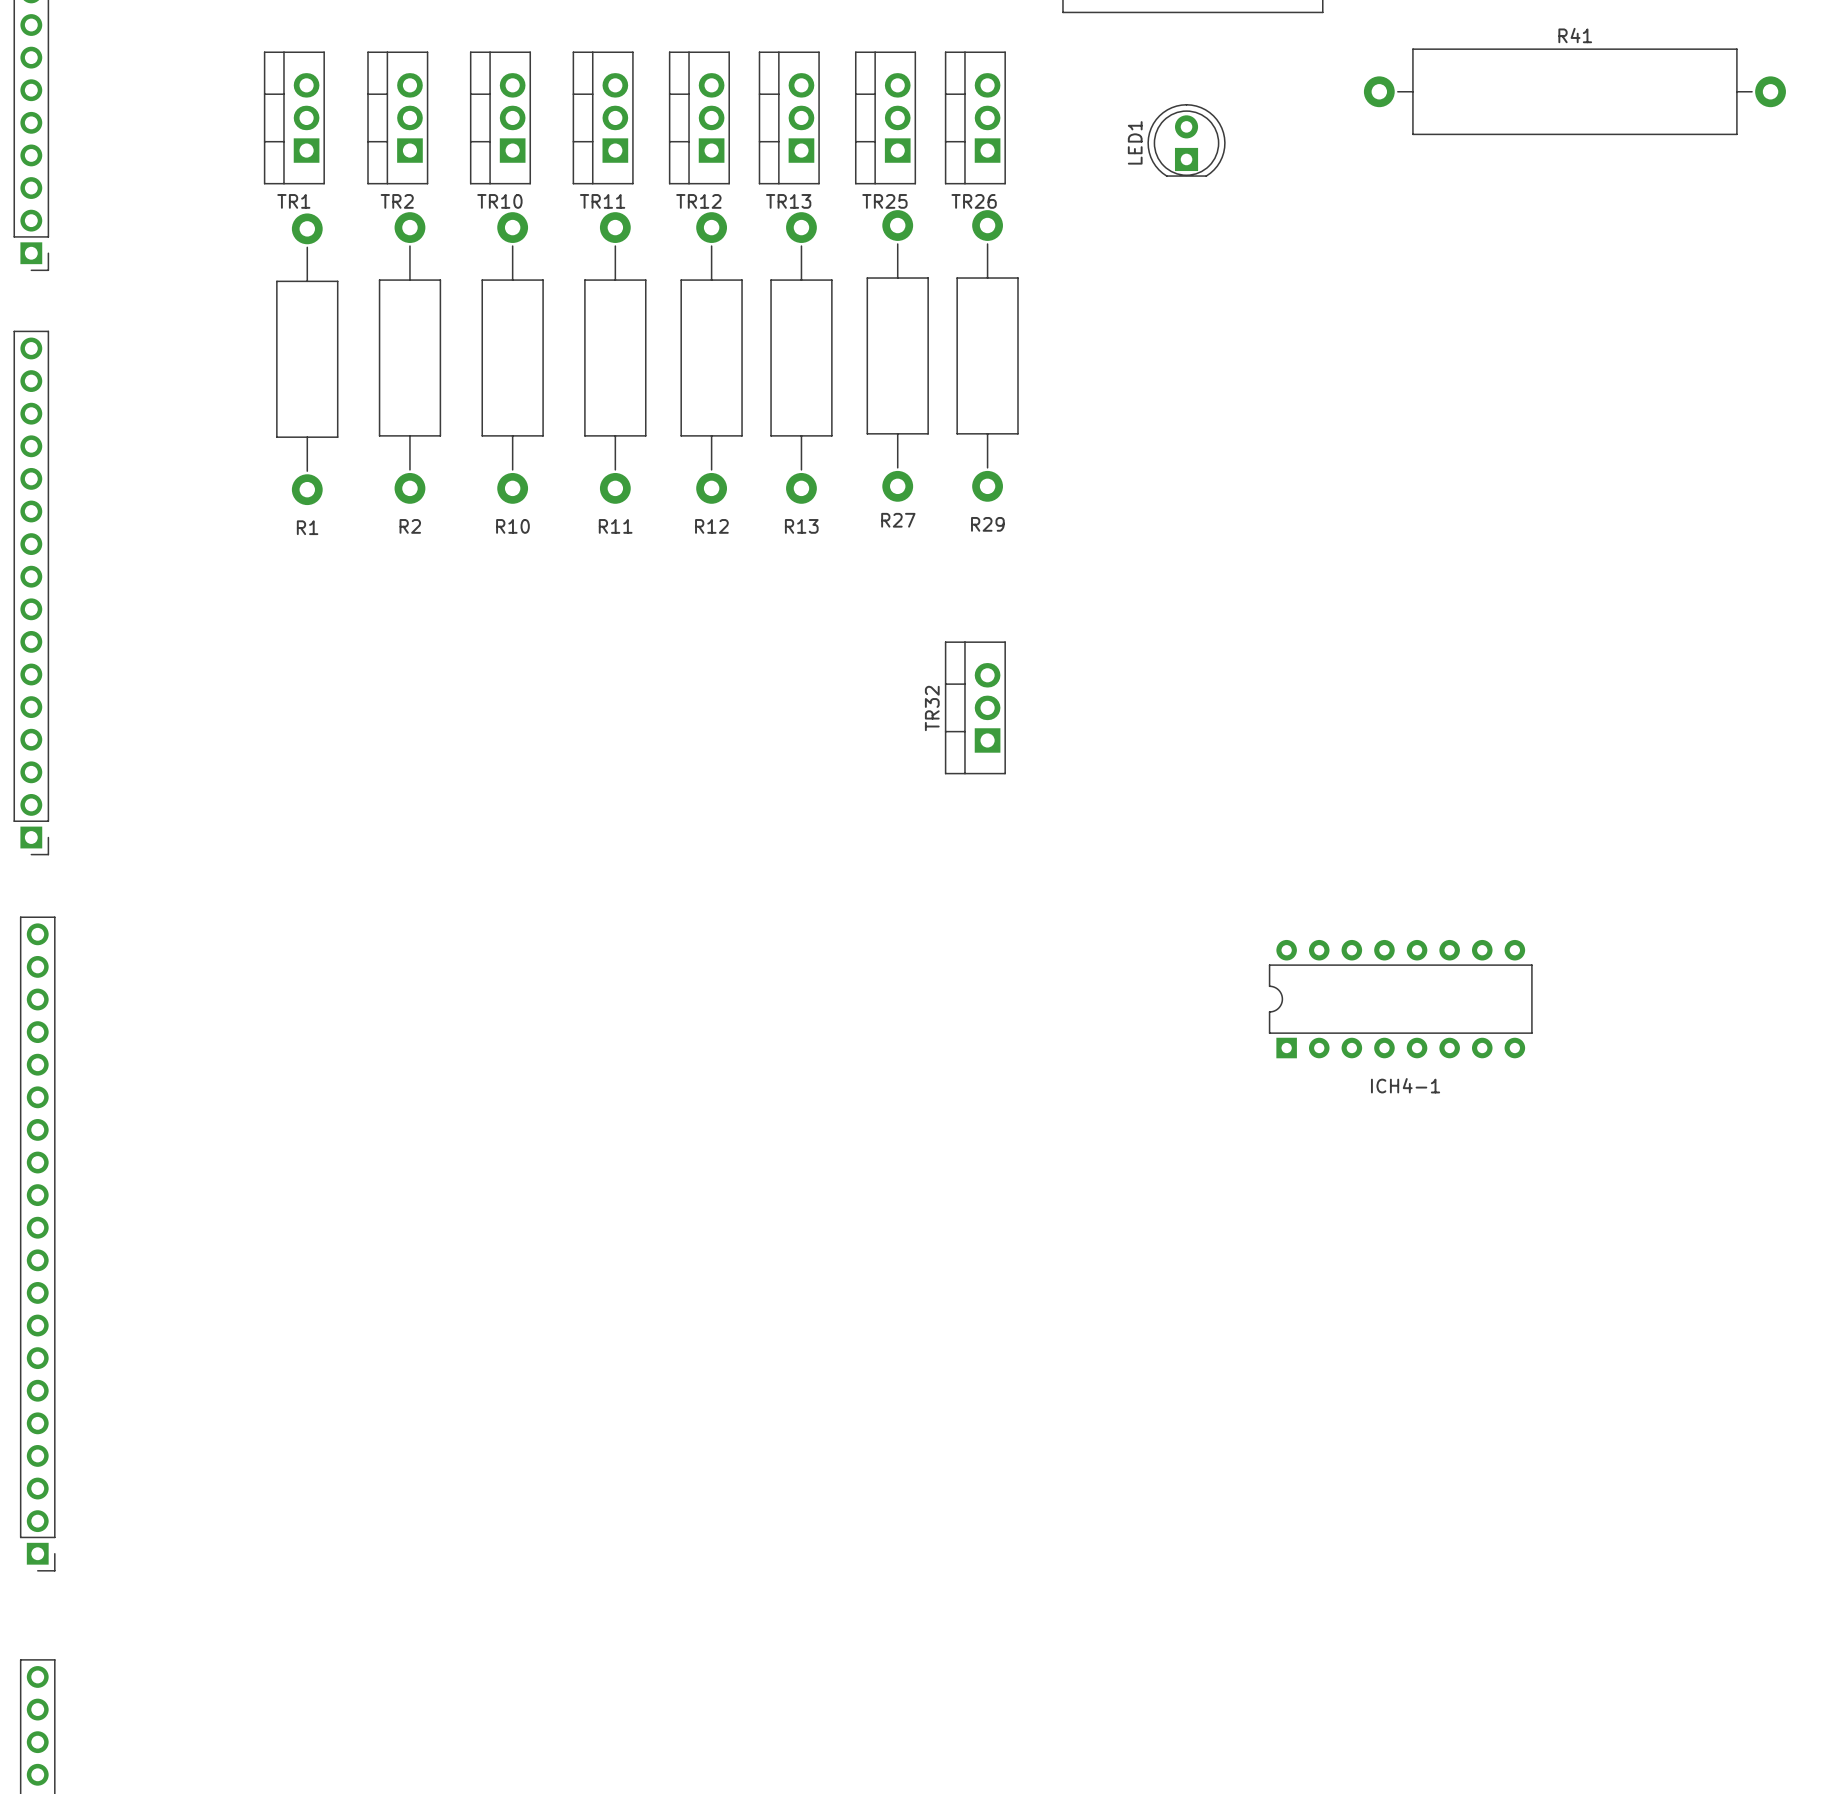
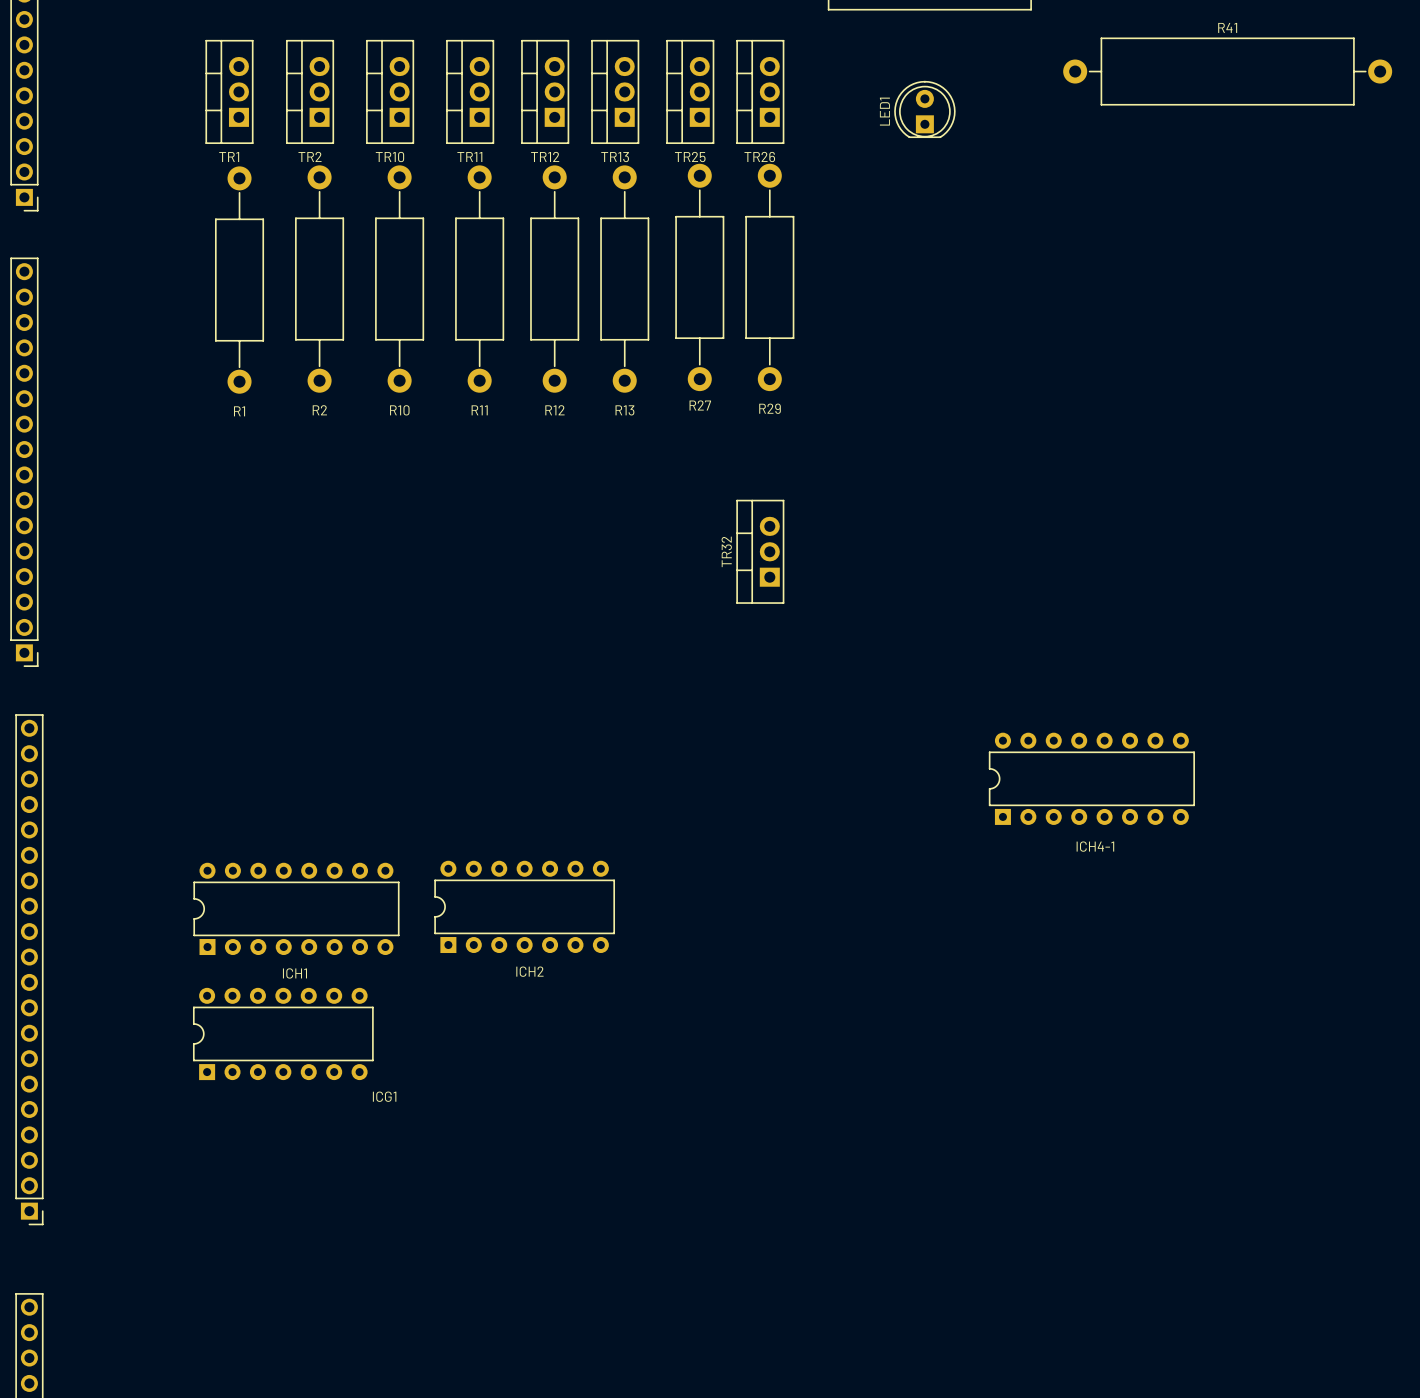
ICH2: none -> (524, 906)
ICH1: none -> (296, 908)
ICG1: none -> (283, 1033)

